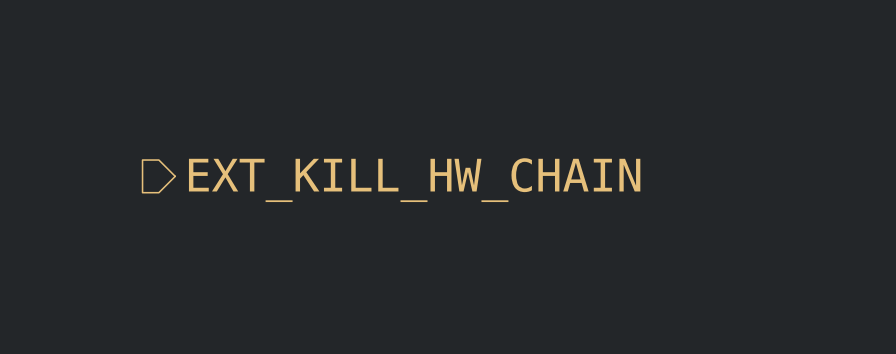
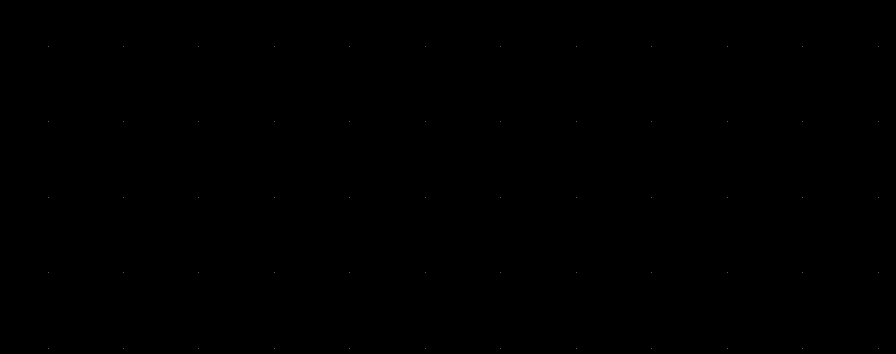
hierarchical label: EXT_KILL_HW_CHAIN (414, 180) -> none

